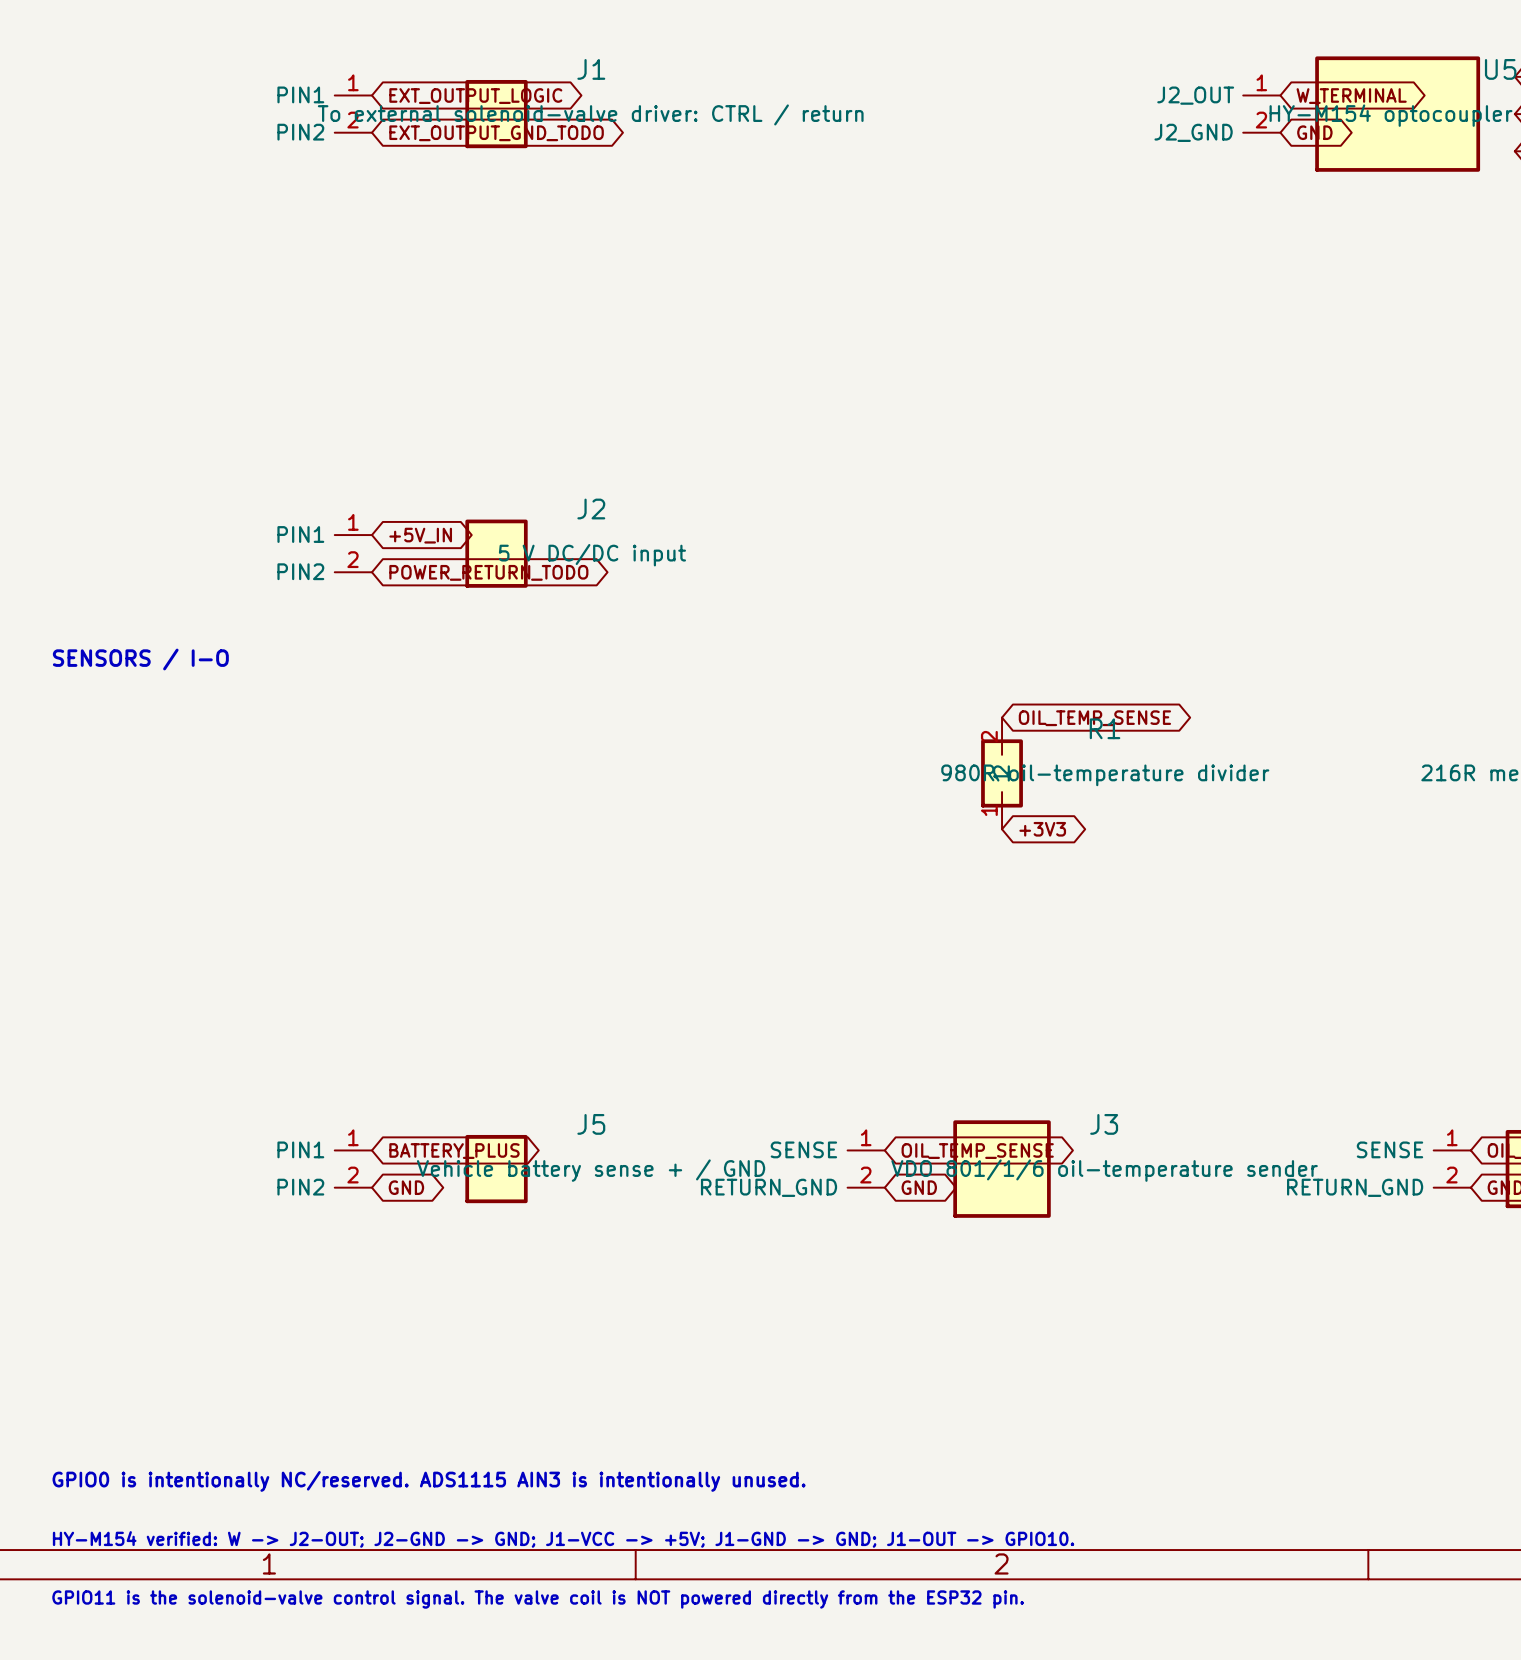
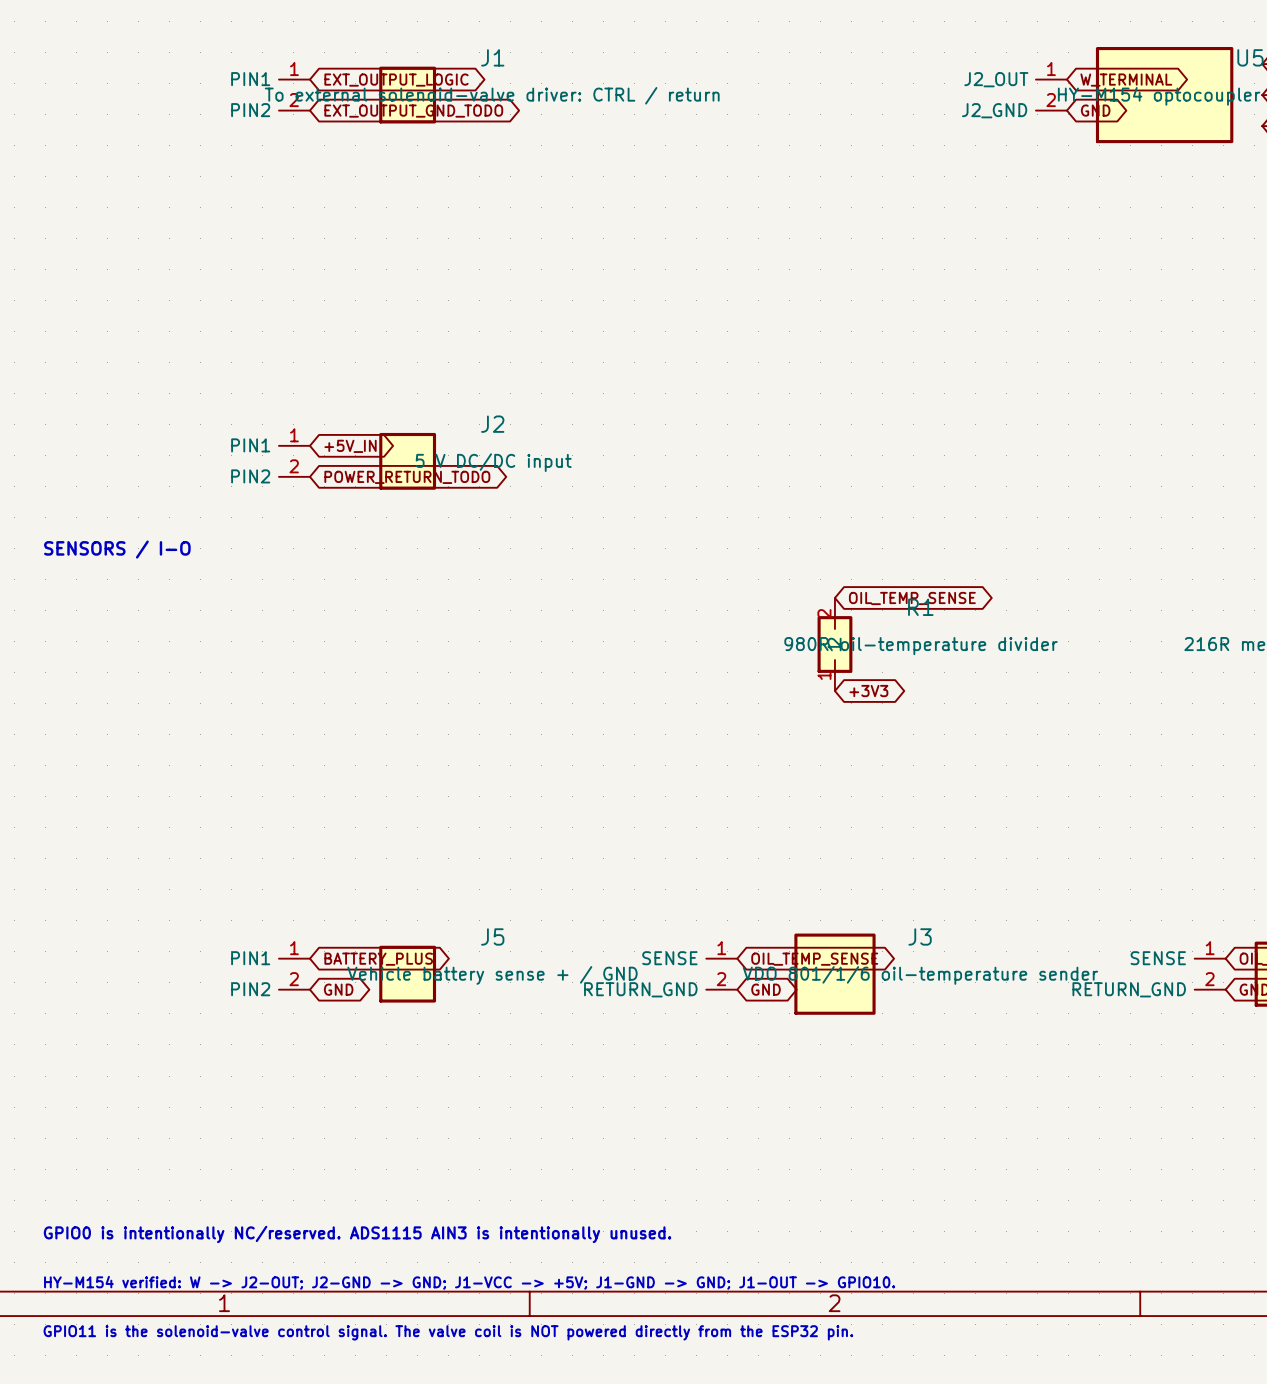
J1 symbol: [334, 79, 528, 149] -> [278, 66, 437, 124]
J2 symbol: [334, 519, 528, 588] -> [278, 432, 437, 490]
J5 symbol: [334, 1134, 528, 1204] -> [278, 945, 437, 1003]

